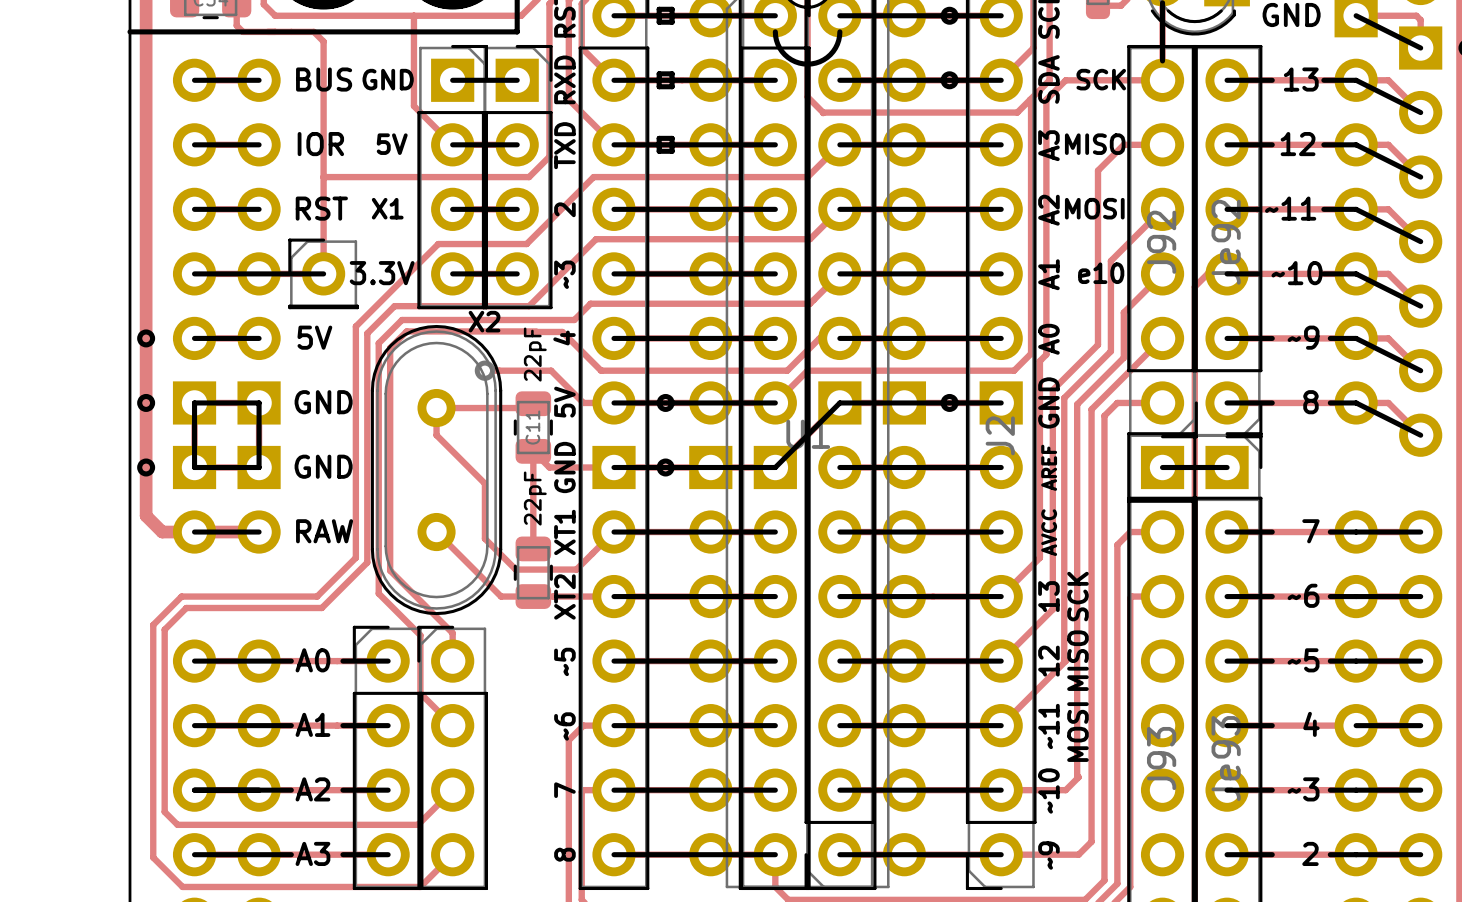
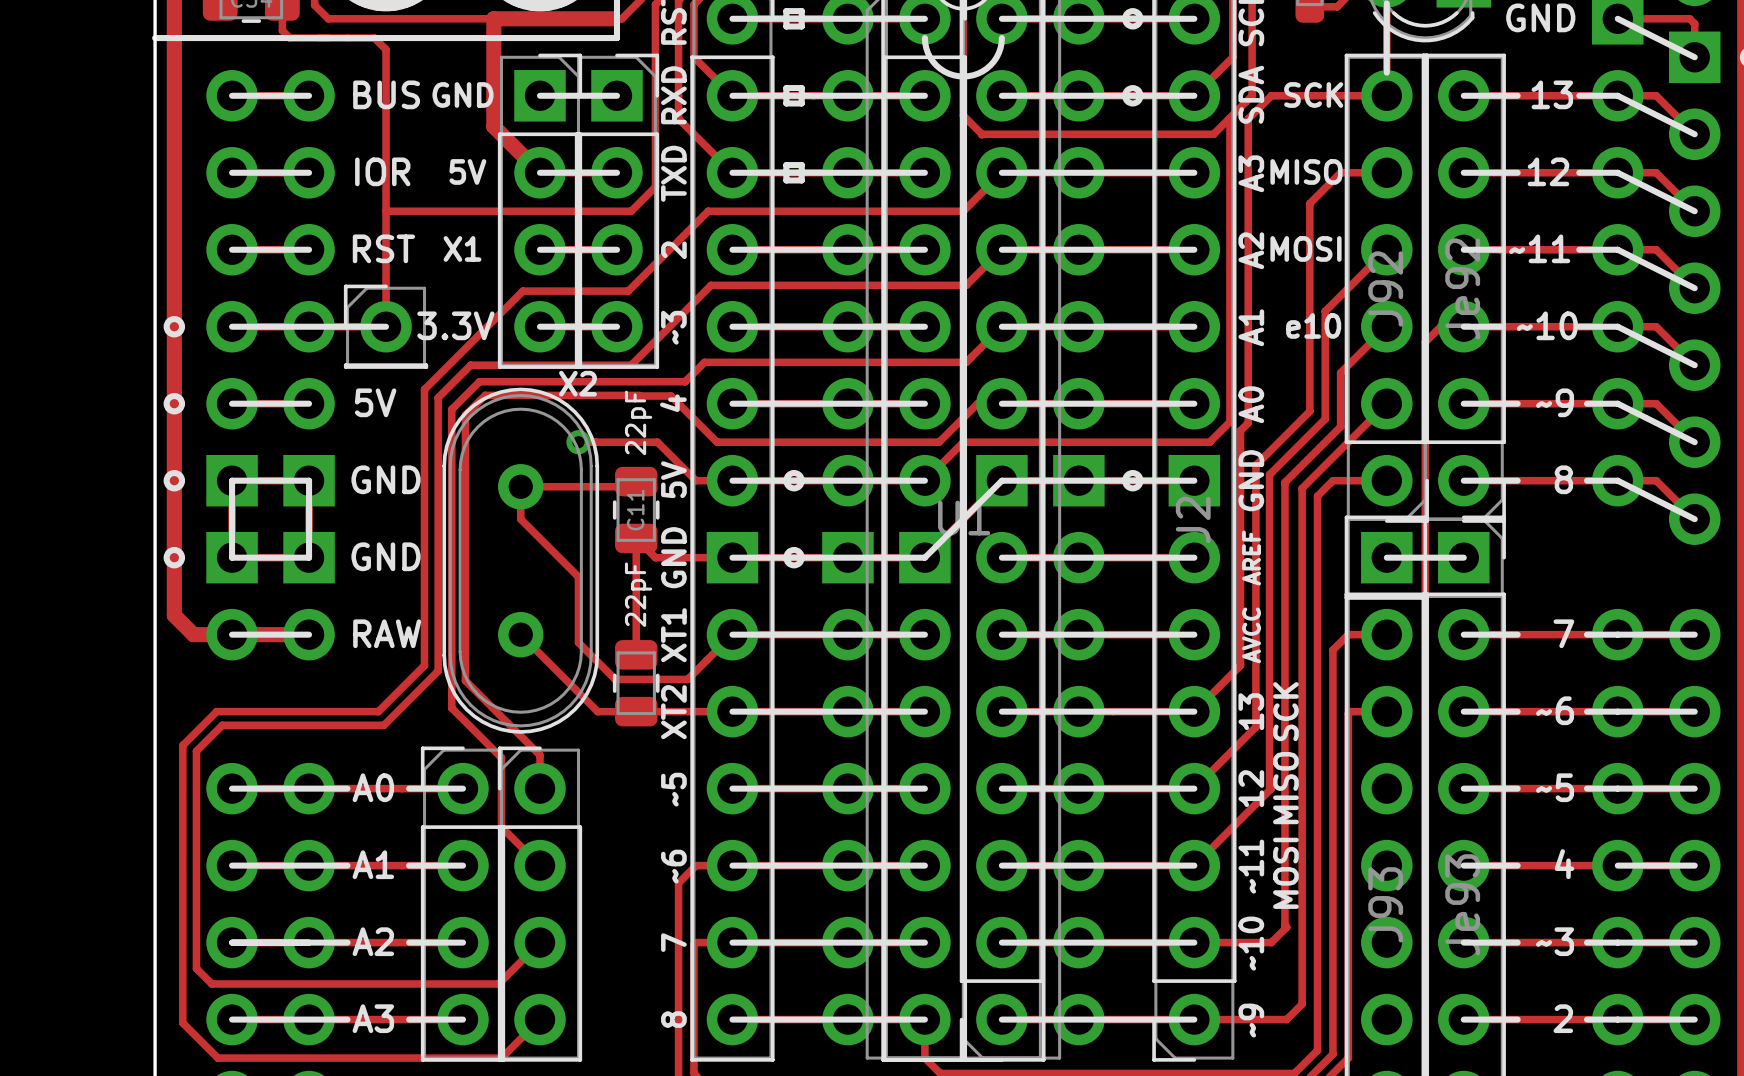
track width: thin (513, 15) (413, 15) (413, 106) (452, 144) -> thick (613, 18) (493, 18) (493, 126) (540, 172)
drawing: none -> [163, 316, 186, 338]

